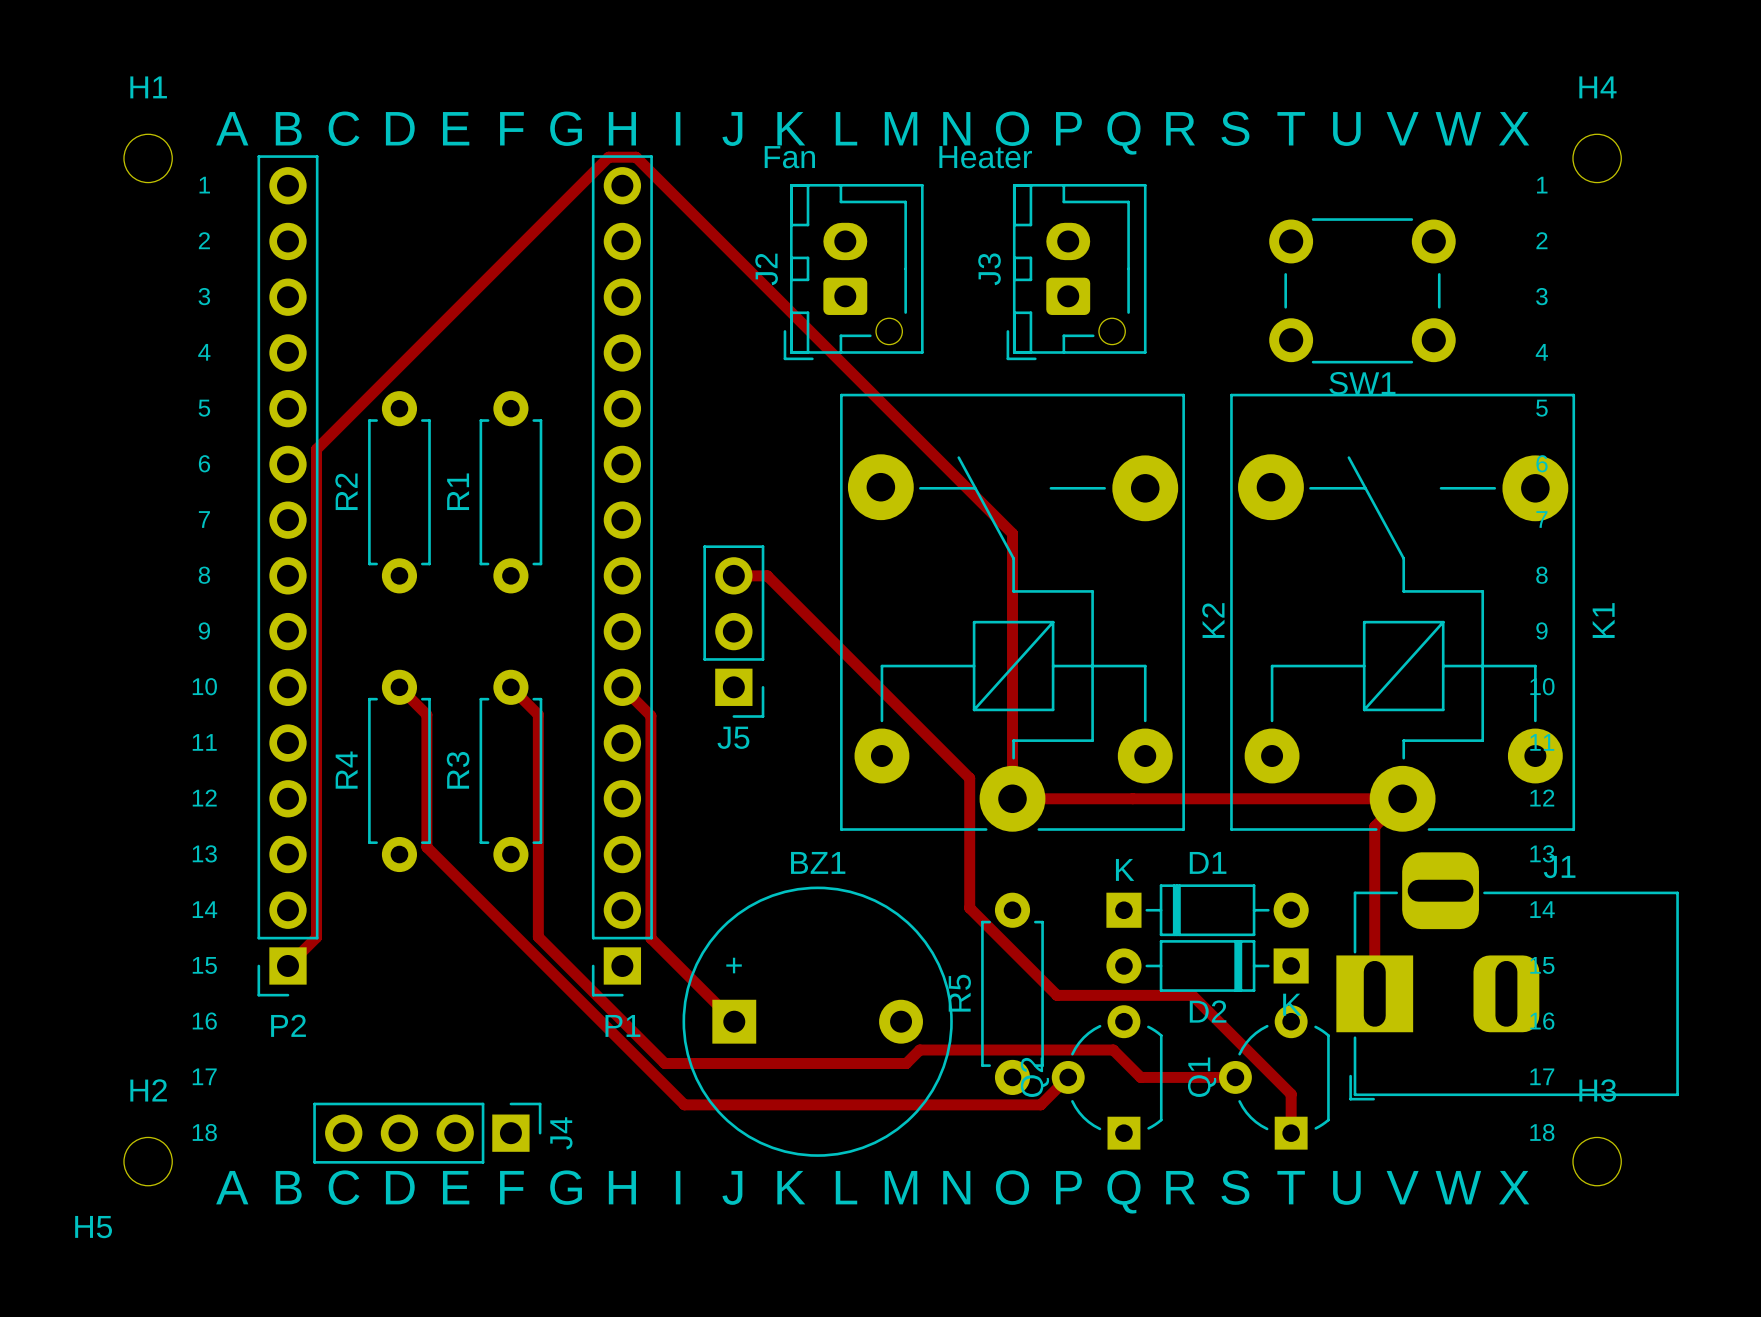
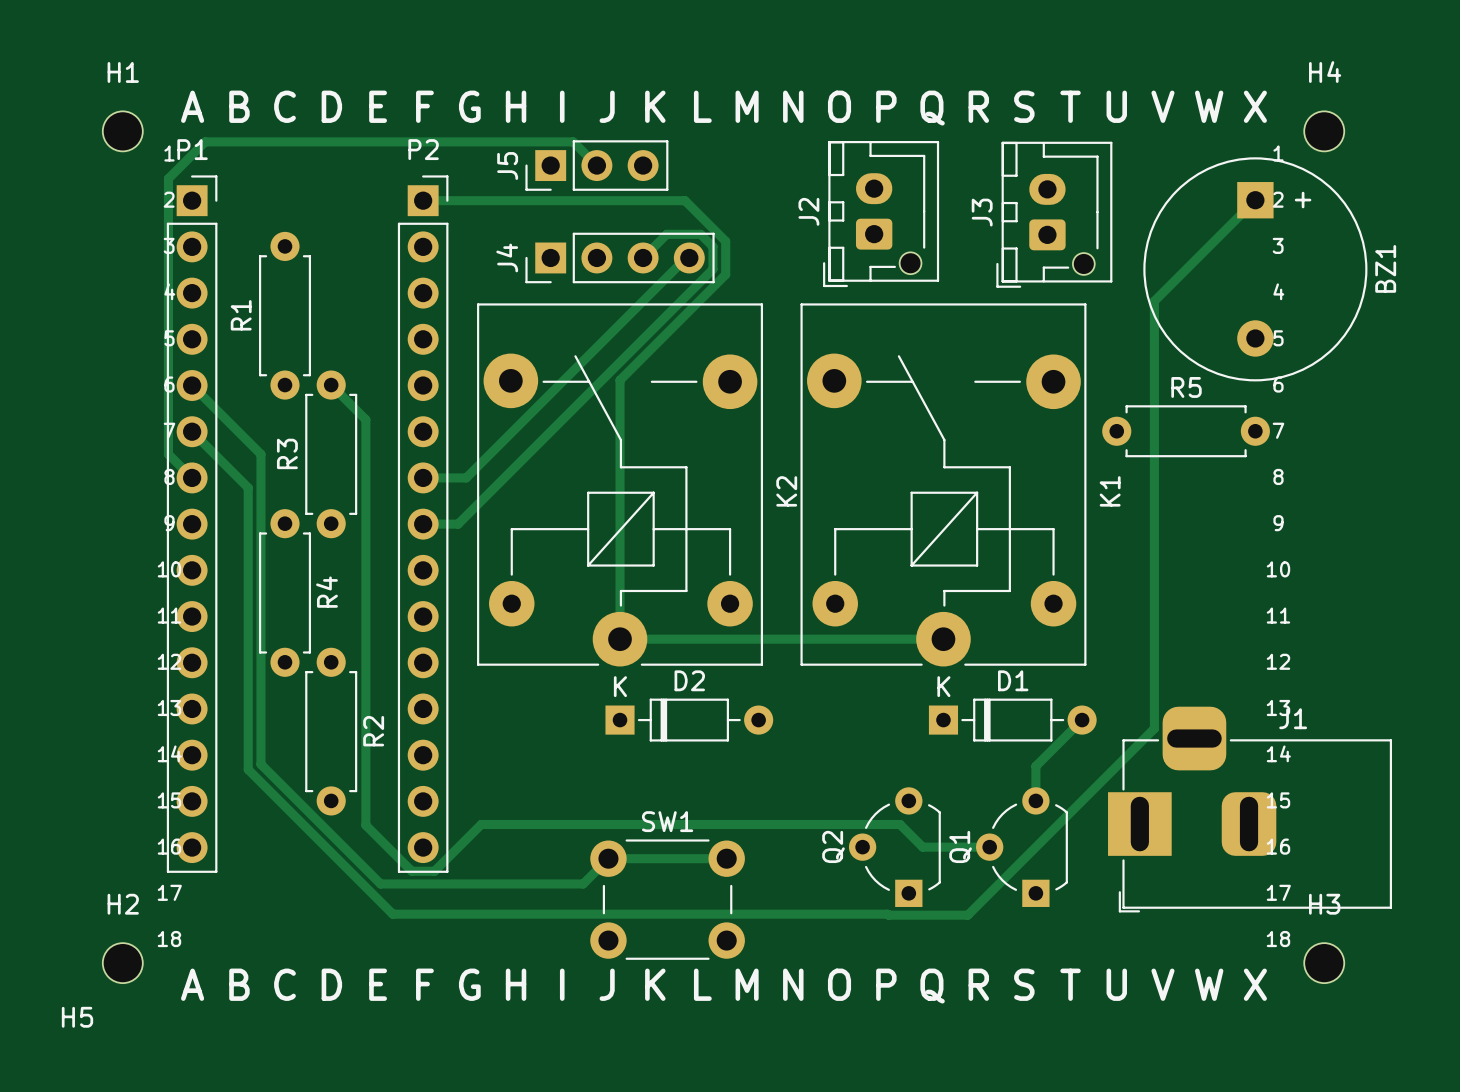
text: Fan (789, 157) -> none
text: Heater (985, 157) -> none
track: none -> (596, 165) (573, 141) (205, 141) (168, 178) (168, 454) (192, 477)
track: none -> (1255, 200) (1154, 301) (1154, 728) (967, 915) (392, 914) (248, 769) (248, 487) (192, 431)
track: none -> (423, 200) (685, 200) (725, 241) (725, 274) (620, 380) (620, 639) (943, 639)
J2 position: (853, 272) -> (881, 214)
J3 position: (1076, 272) -> (1054, 214)
SW1 position: (1362, 290) -> (667, 899)
track: none -> (643, 257) (666, 234) (700, 234) (712, 246) (712, 269) (458, 524) (423, 524)
track: none -> (689, 257) (686, 257) (466, 477) (423, 477)
SW1 name position: SW1 (1362, 383) -> SW1 (667, 821)
track: none -> (192, 385) (260, 454) (260, 764) (380, 883) (583, 883) (608, 858) (726, 858)
track: none -> (331, 385) (365, 419) (365, 825) (411, 871) (434, 871) (481, 824) (900, 824) (922, 847) (989, 847)
R2 name position: R2 (346, 491) -> R2 (373, 731)
R2 position: (399, 492) -> (331, 731)
R1 position: (510, 492) -> (285, 315)
P2 rotation: 0° (287, 575) -> 180° (423, 524)
P1 rotation: 0° (622, 575) -> 180° (192, 524)
track: (733, 575) (767, 575) (969, 778) (969, 908) (1057, 995) (1192, 995) (1291, 1094) (1291, 1133) -> none
K2 position: (1012, 612) -> (620, 484)
K1 position: (1402, 612) -> (943, 484)
J5 rotation: 0° (733, 631) -> 90° clockwise (596, 165)
J5 position: (733, 631) -> (596, 165)
track: (399, 687) (426, 714) (426, 847) (684, 1104) (1040, 1104) (1068, 1077) -> none
track: (510, 687) (538, 714) (538, 937) (664, 1063) (906, 1063) (919, 1050) (1113, 1050) (1140, 1077) (1235, 1077) -> none
track: (622, 687) (650, 715) (650, 938) (734, 1021) -> none
R4 name position: R4 (346, 770) -> R4 (327, 592)
R4 position: (399, 770) -> (285, 592)
R3 position: (510, 770) -> (331, 454)
track: none -> (1082, 720) (1035, 766) (1035, 800)
D1 position: (1207, 910) -> (1012, 720)
track: (287, 965) (316, 937) (316, 449) (608, 157) (636, 157) (1012, 533) (1012, 798) (1402, 798) (1374, 826) (1374, 993) -> none
D2 rotation: 0° (1207, 965) -> 180° (689, 720)
D2 position: (1207, 965) -> (689, 720)
R5 rotation: 0° (1012, 993) -> 90° clockwise (1186, 431)
R5 position: (1012, 993) -> (1186, 431)
BZ1 rotation: 0° (817, 1021) -> 90° clockwise (1255, 269)
BZ1 position: (817, 1021) -> (1255, 269)
Q2 position: (1107, 1077) -> (894, 847)
Q1 position: (1274, 1077) -> (1021, 847)
J4 rotation: 0° (427, 1133) -> 180° (620, 257)
J4 position: (427, 1133) -> (620, 257)

